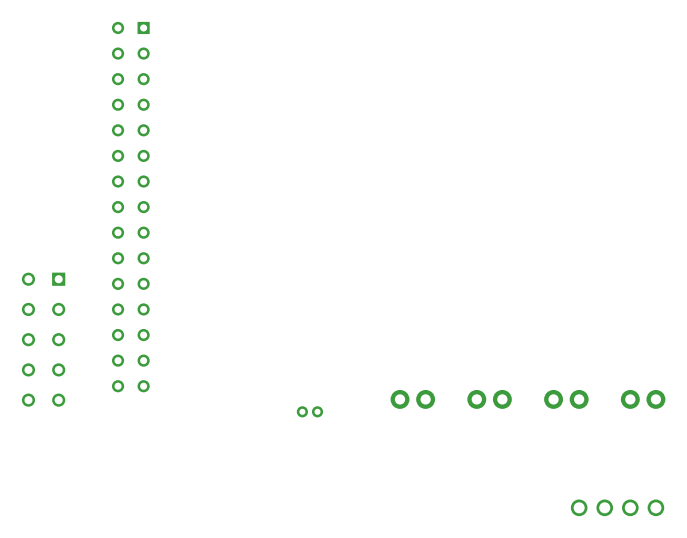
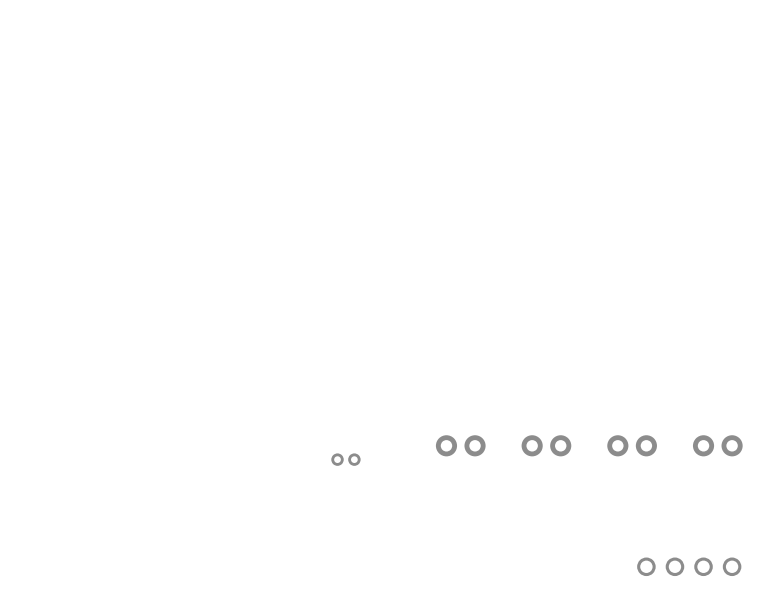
part: (130, 207) -> none
part: (43, 339) -> none

